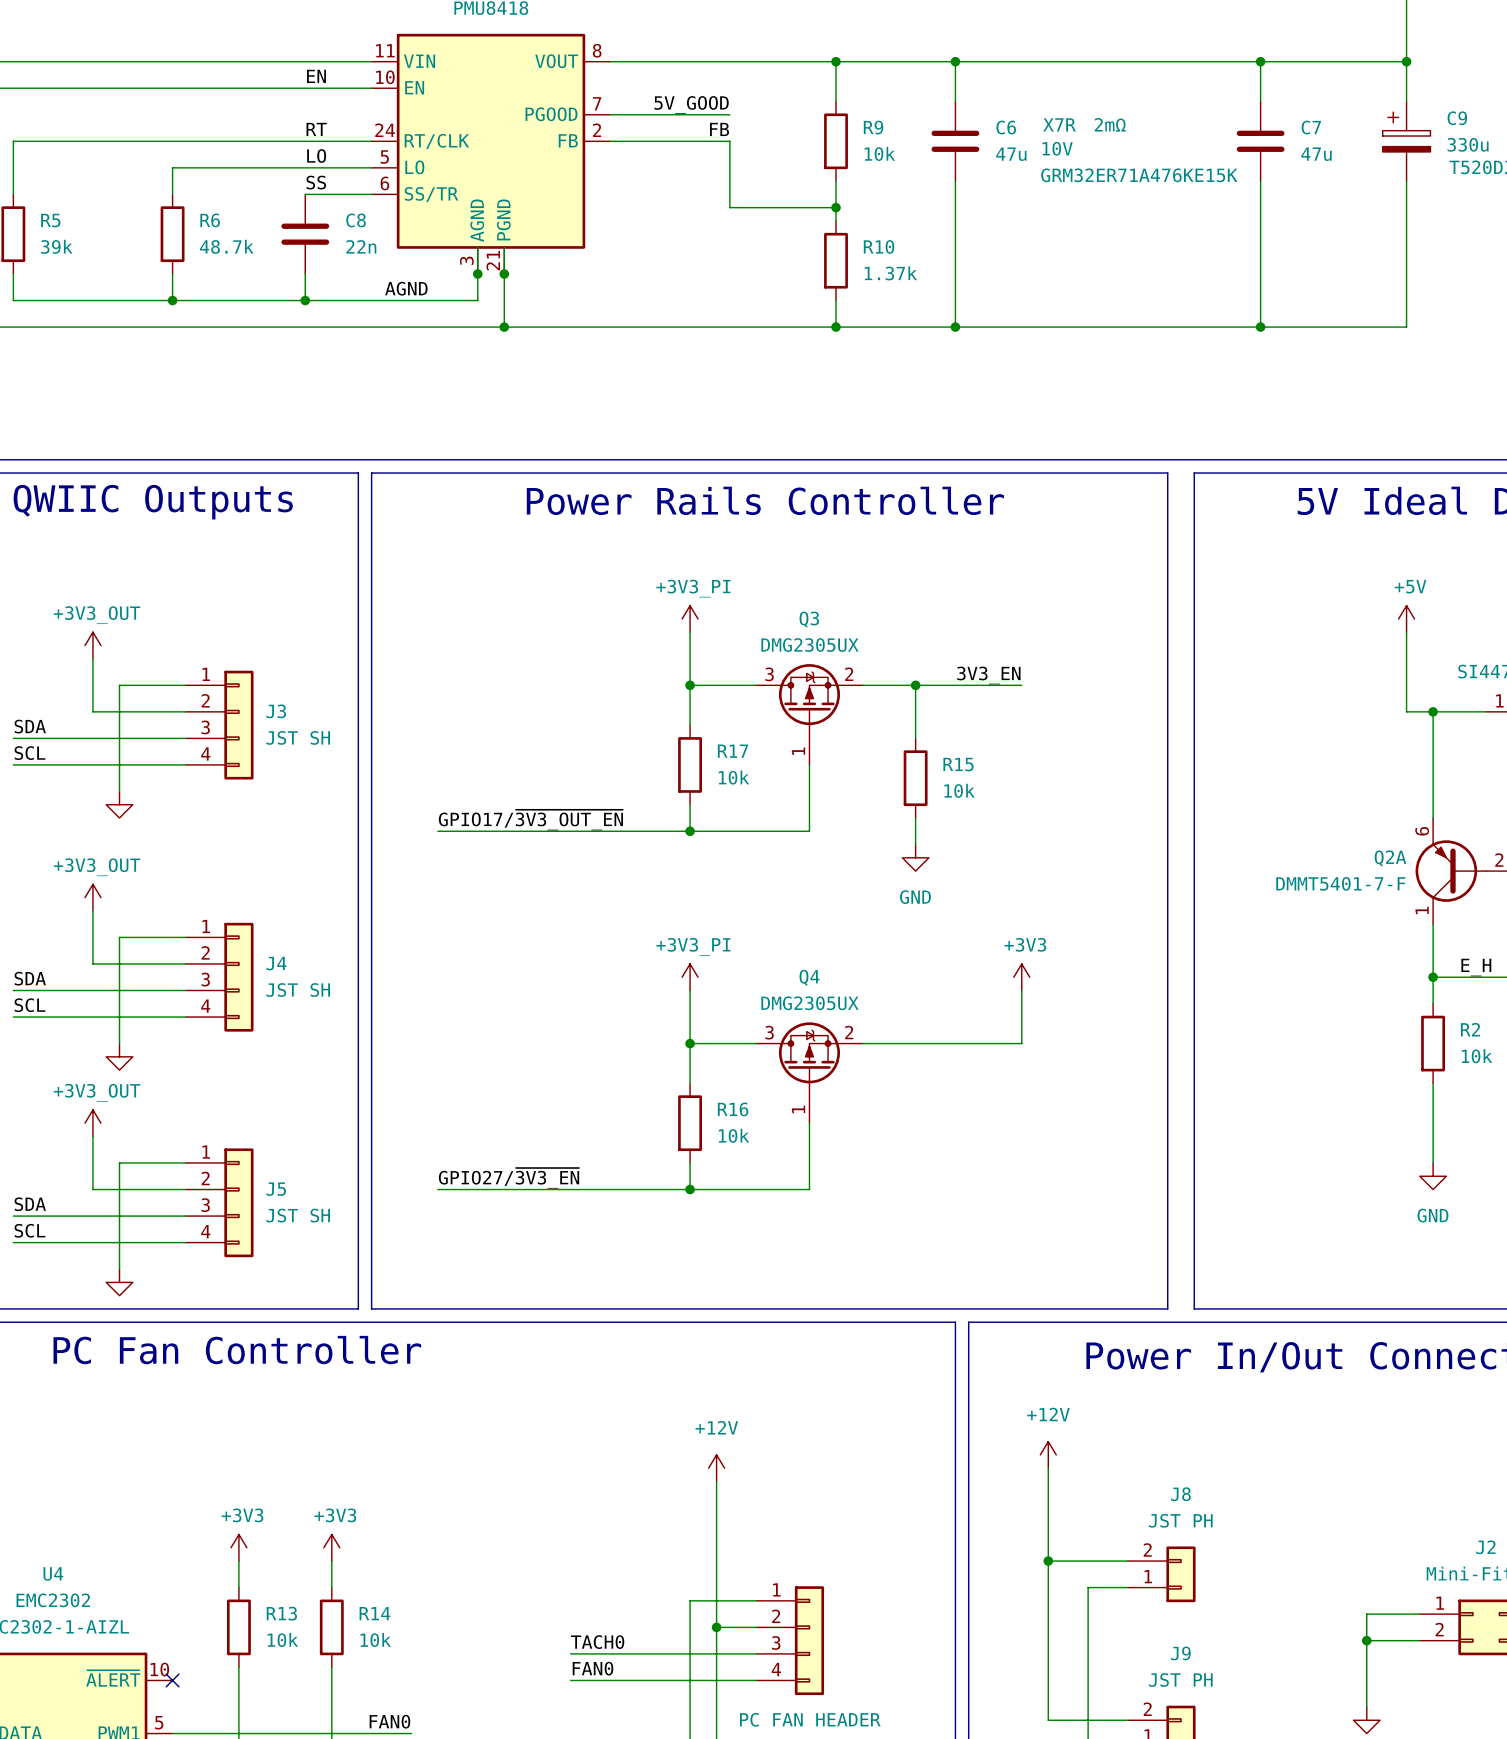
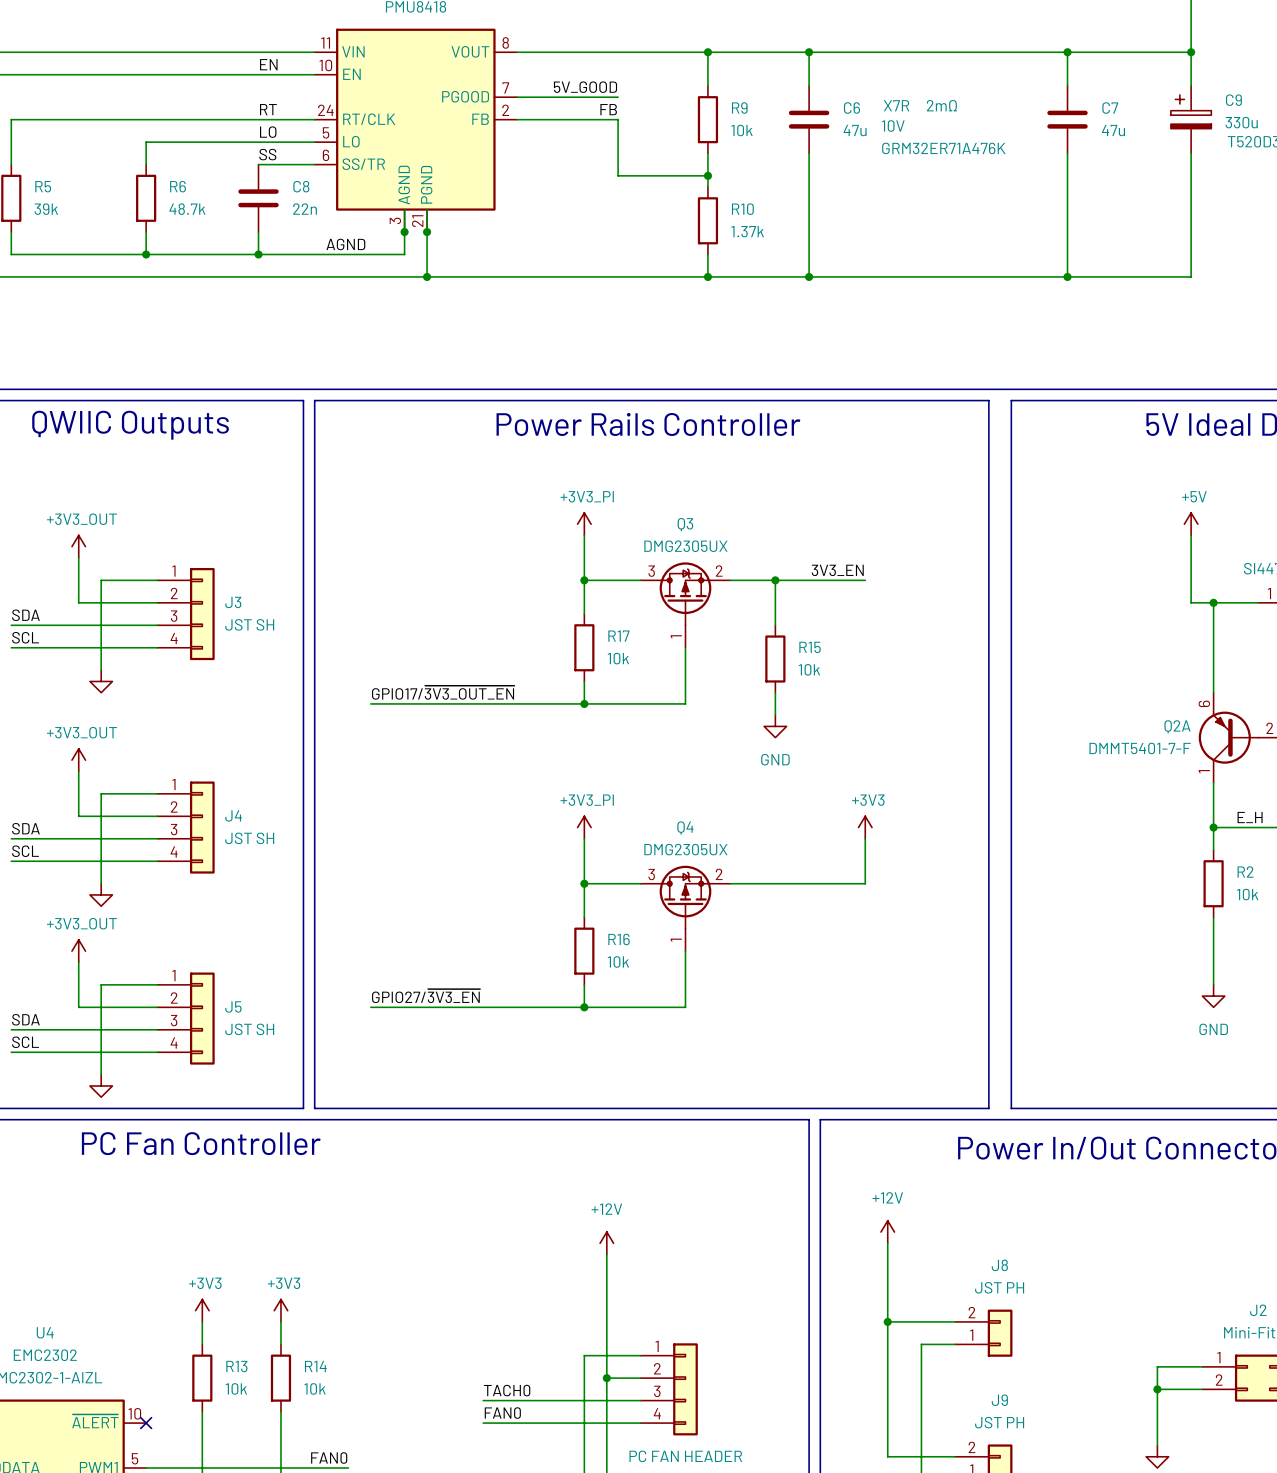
C6 text: GRM32ER71A476KE15K (1139, 175) -> GRM32ER71A476K (943, 148)

